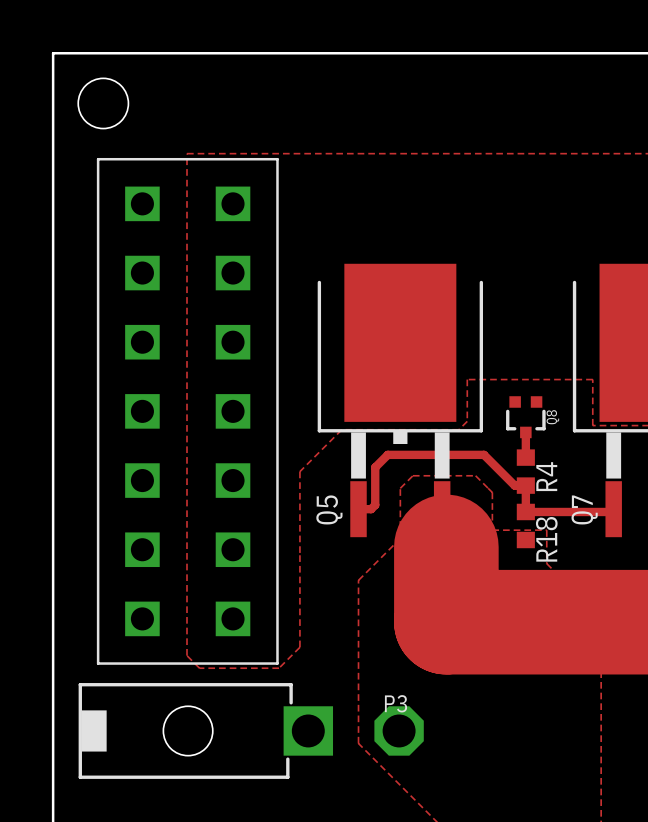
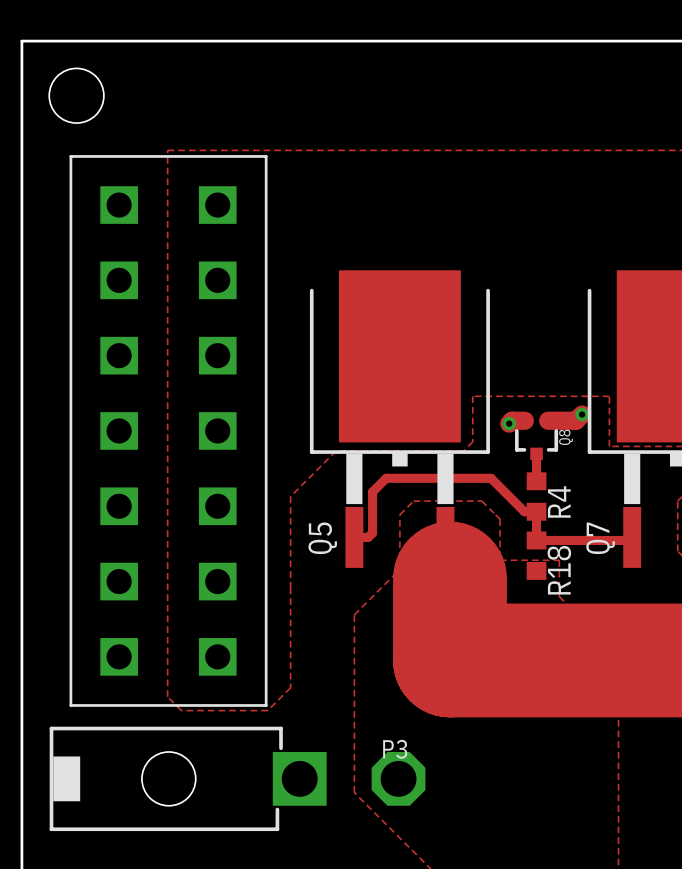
track: none -> (582, 414) (575, 420) (548, 420)
via: none -> (582, 414)
track: none -> (524, 420) (512, 420) (509, 423)
via: none -> (509, 423)

